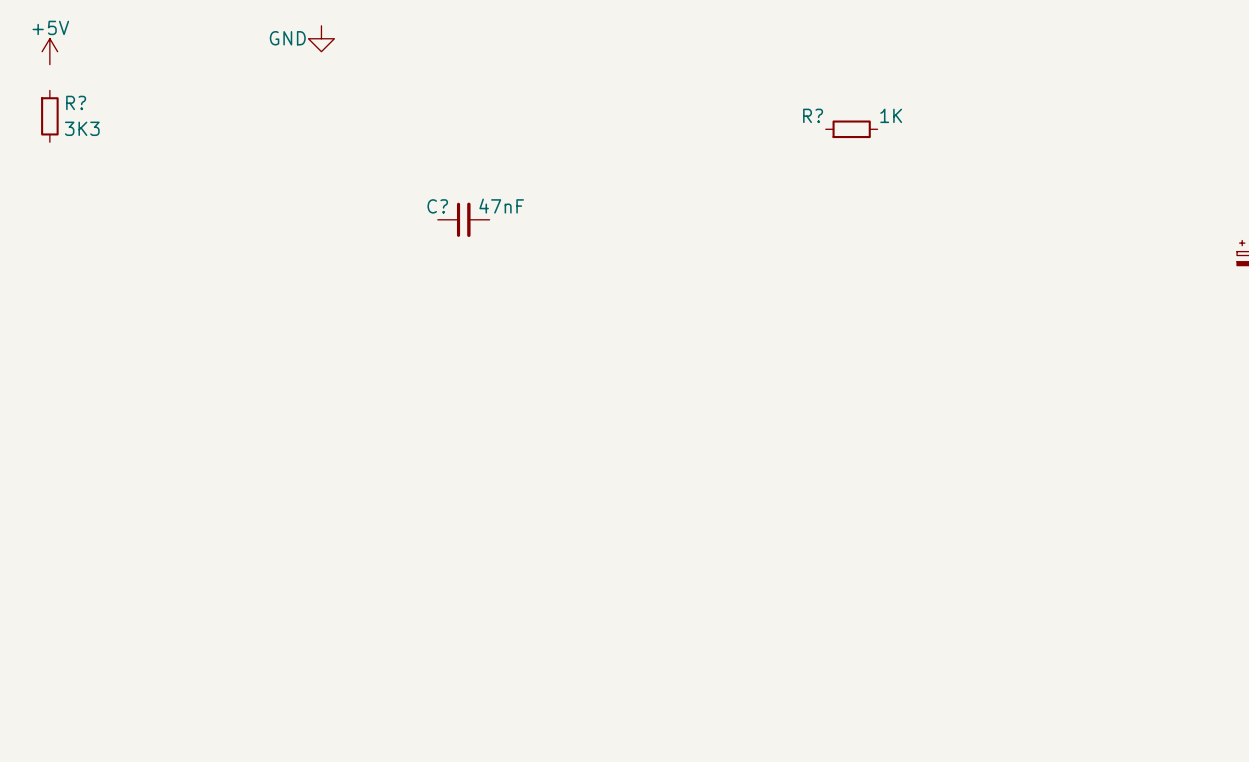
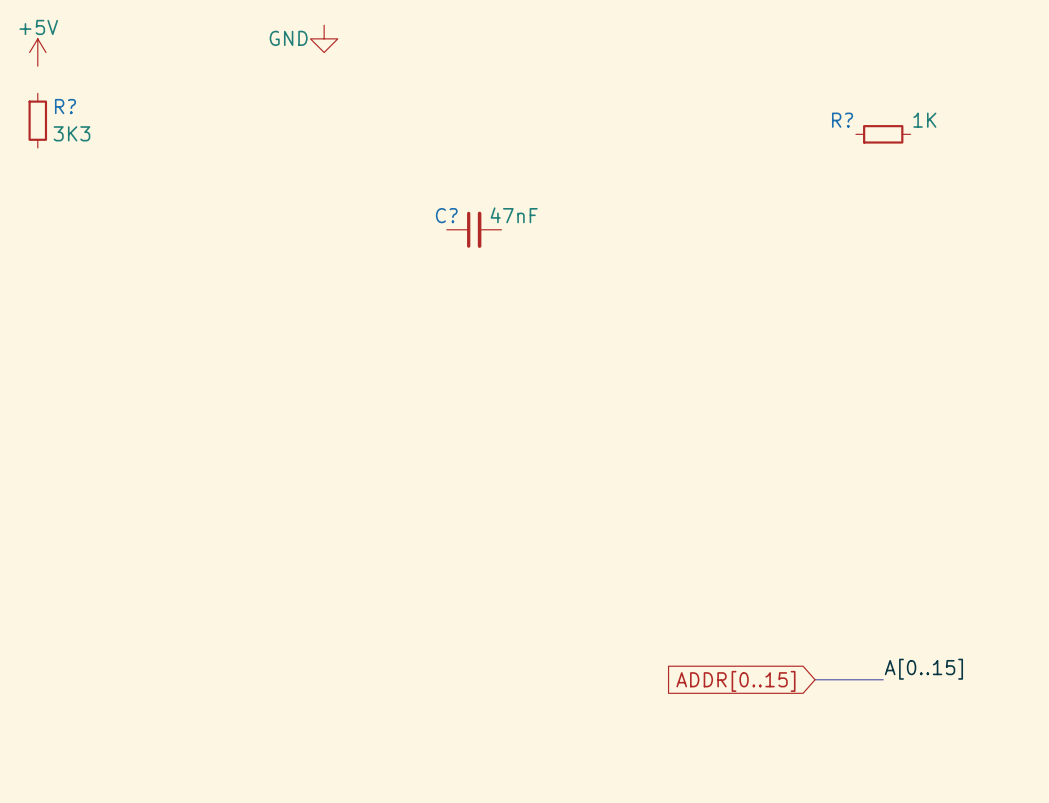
label: none -> A[0..15] (923, 669)
bus: none -> (815, 679) (883, 679)
global label: none -> ADDR[0..15] (735, 681)

